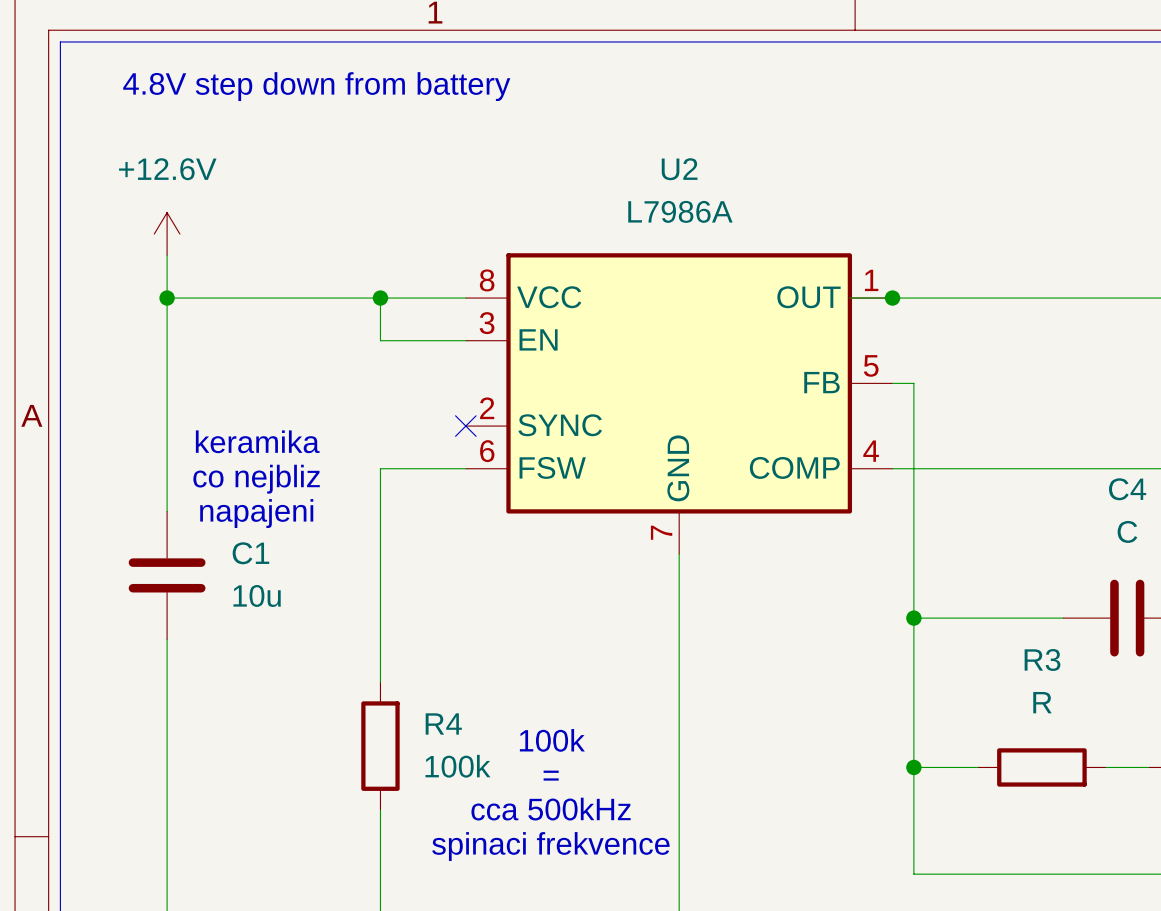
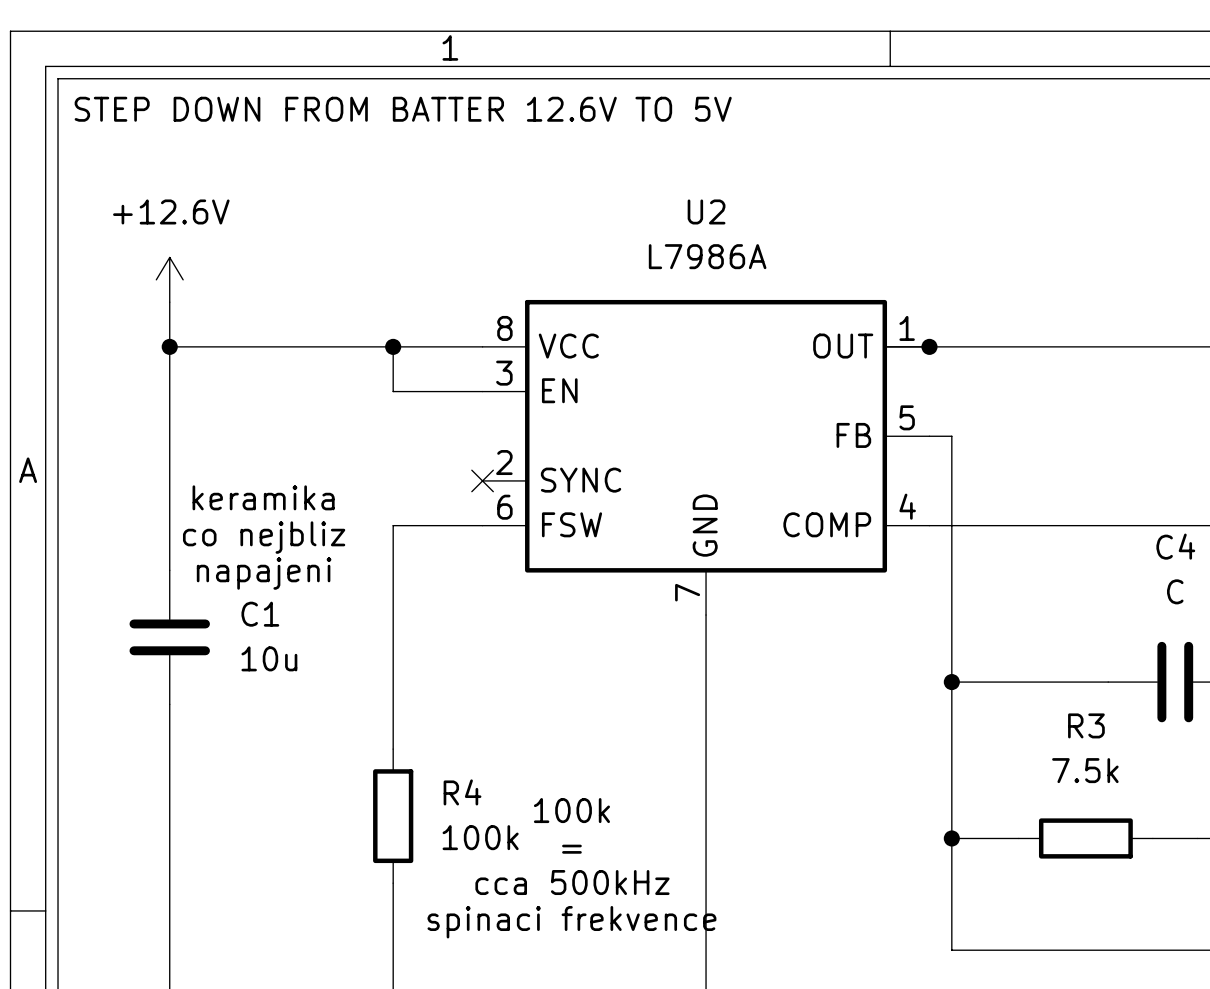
text: none -> STEP DOWN FROM BATTER 12.6V TO 5V (403, 109)
text: 4.8V step down from battery (316, 86) -> none
R3 value: R (1042, 702) -> 7.5k (1085, 770)

